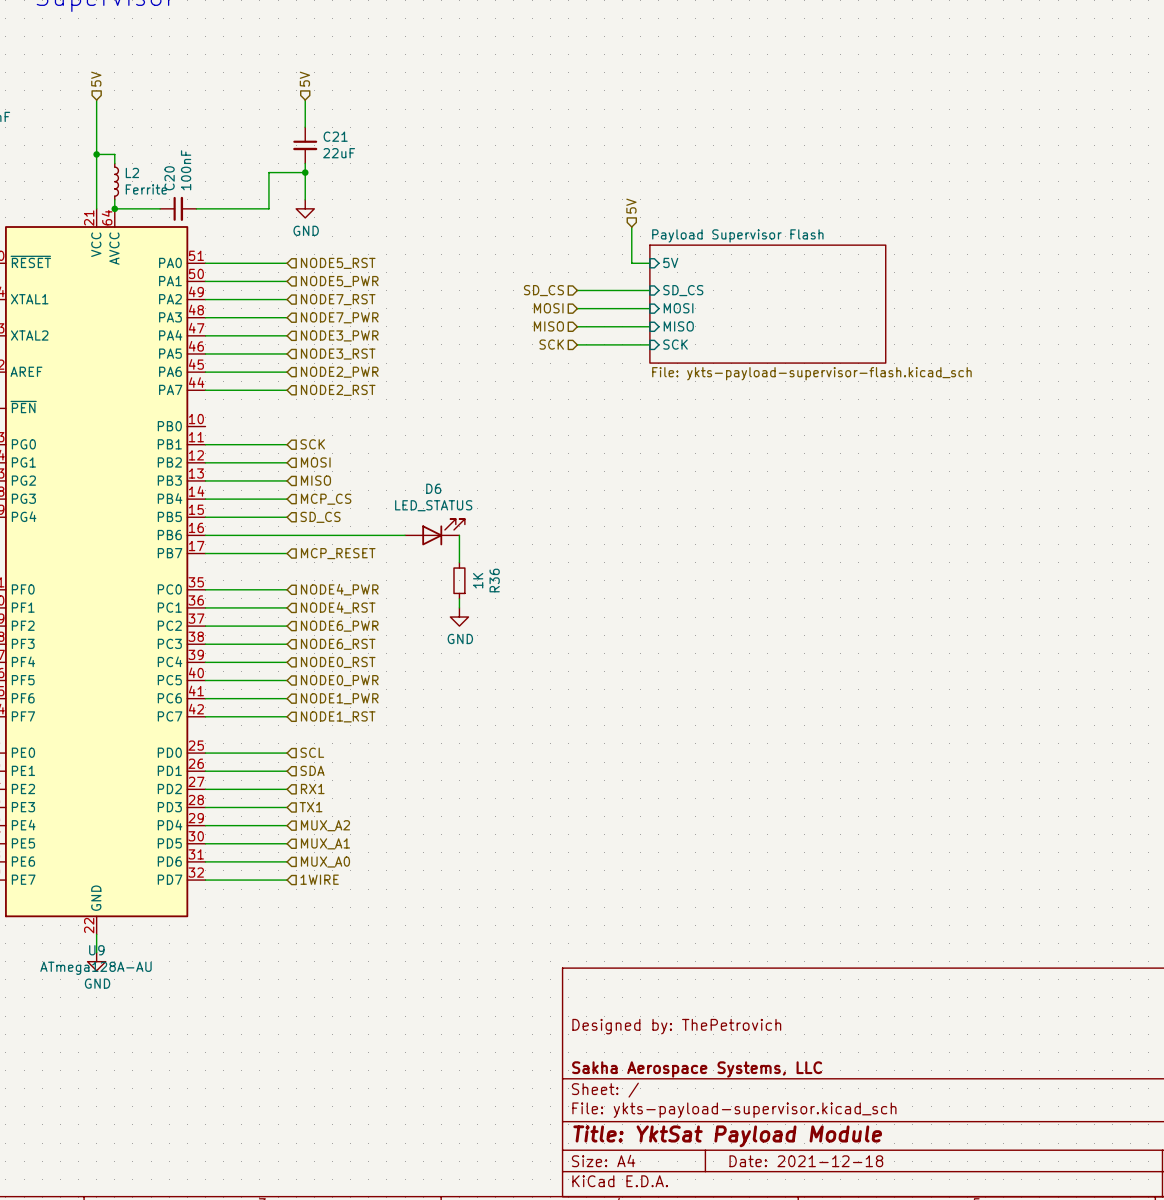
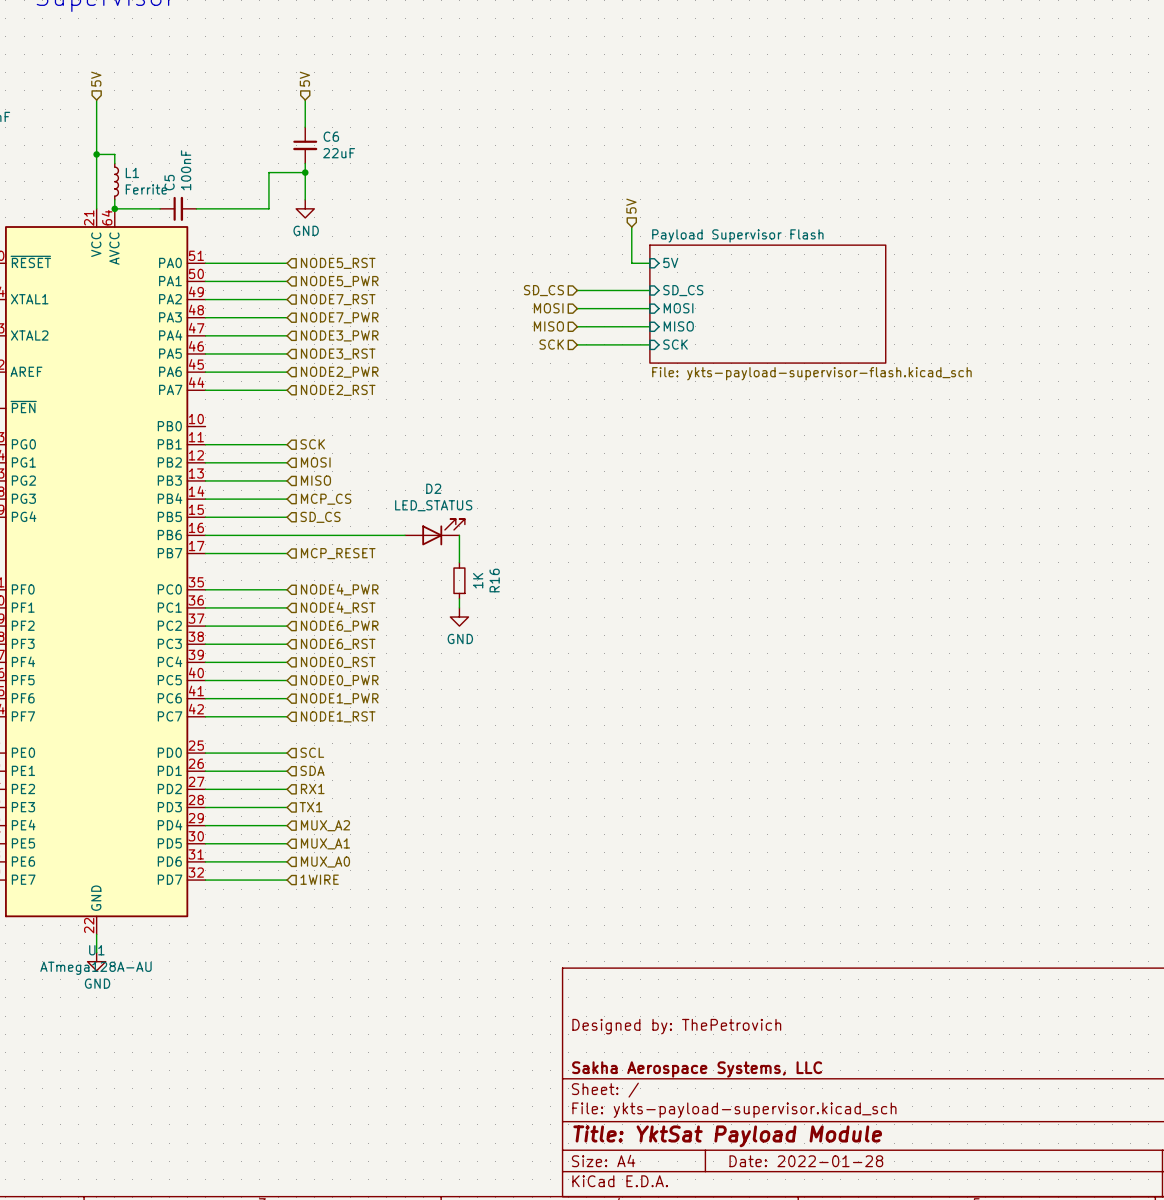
C21 name: C21 (335, 136) -> C6 (331, 136)
L2 name: L2 (132, 172) -> L1 (132, 172)
C20 name: C20 (169, 178) -> C5 (169, 182)
D6 name: D6 (433, 488) -> D2 (433, 488)
R36 name: R36 (494, 580) -> R16 (494, 580)
U9 name: U9 (96, 950) -> U1 (96, 950)
title block: Date: 2021-12-18 (806, 1161) -> Date: 2022-01-28 (806, 1161)

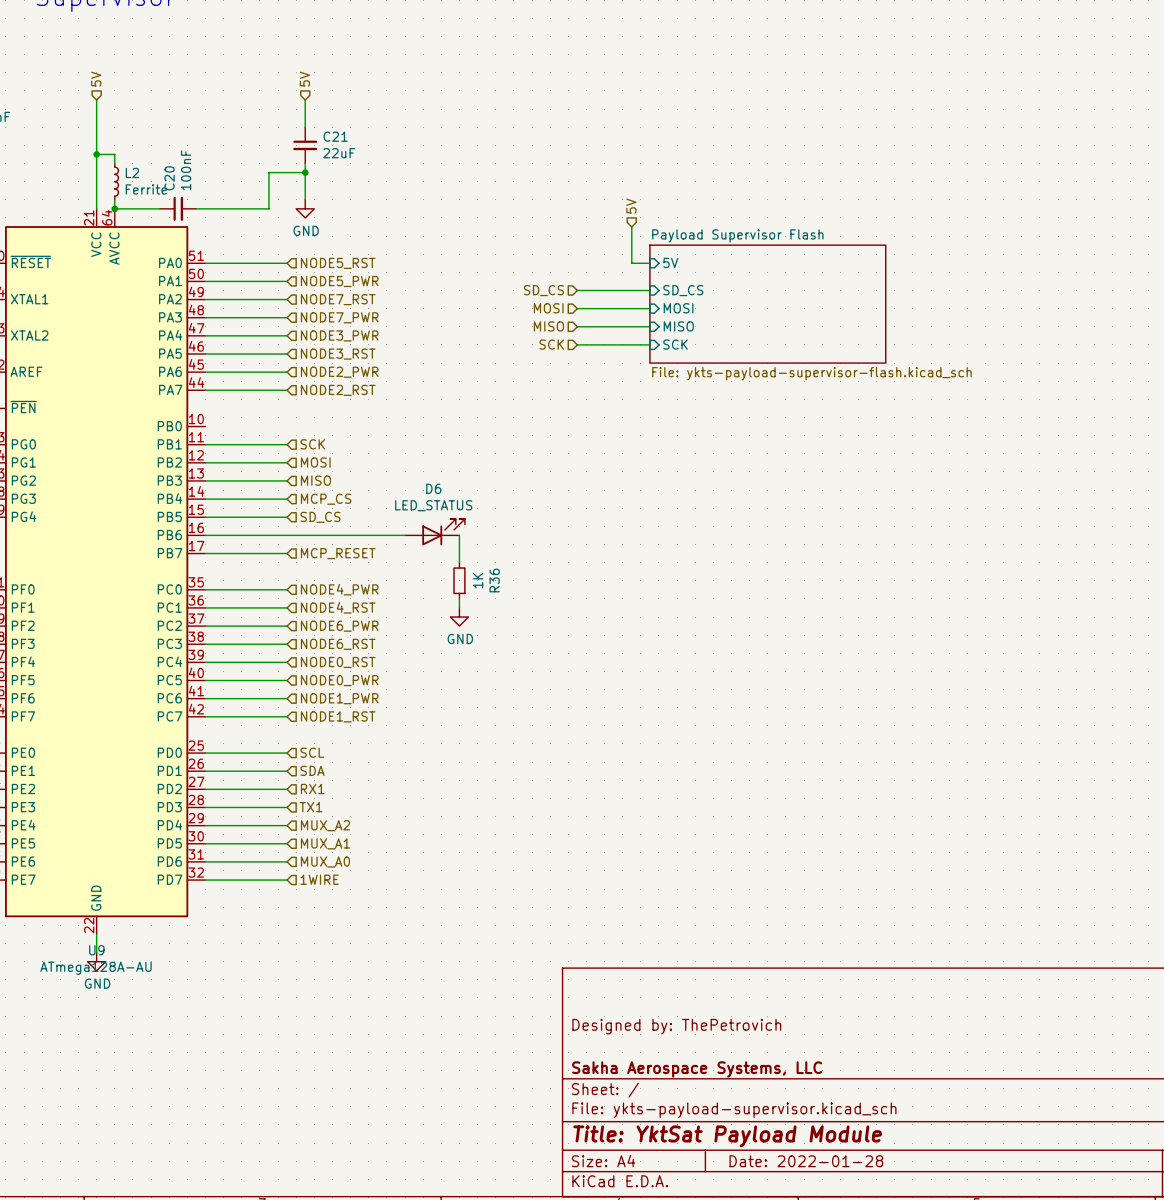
C6 name: C6 (331, 136) -> C21 (335, 136)
L1 name: L1 (132, 172) -> L2 (132, 172)
C5 name: C5 (169, 182) -> C20 (169, 178)
D2 name: D2 (433, 488) -> D6 (433, 488)
R16 name: R16 (494, 580) -> R36 (494, 580)
U1 name: U1 (96, 950) -> U9 (96, 950)

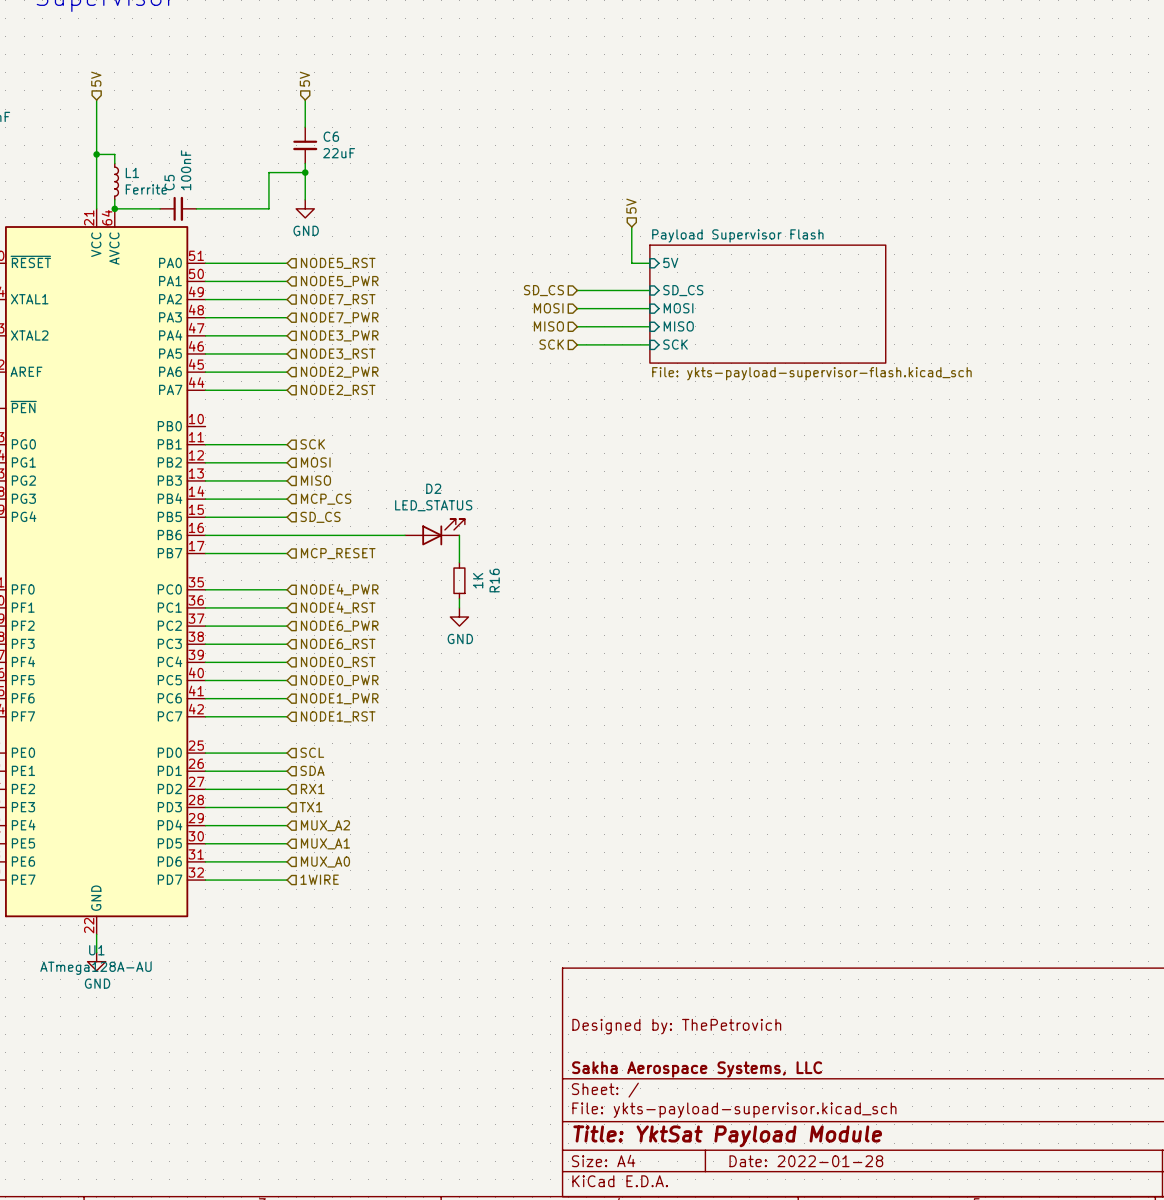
C21 name: C21 (335, 136) -> C6 (331, 136)
L2 name: L2 (132, 172) -> L1 (132, 172)
C20 name: C20 (169, 178) -> C5 (169, 182)
D6 name: D6 (433, 488) -> D2 (433, 488)
R36 name: R36 (494, 580) -> R16 (494, 580)
U9 name: U9 (96, 950) -> U1 (96, 950)

